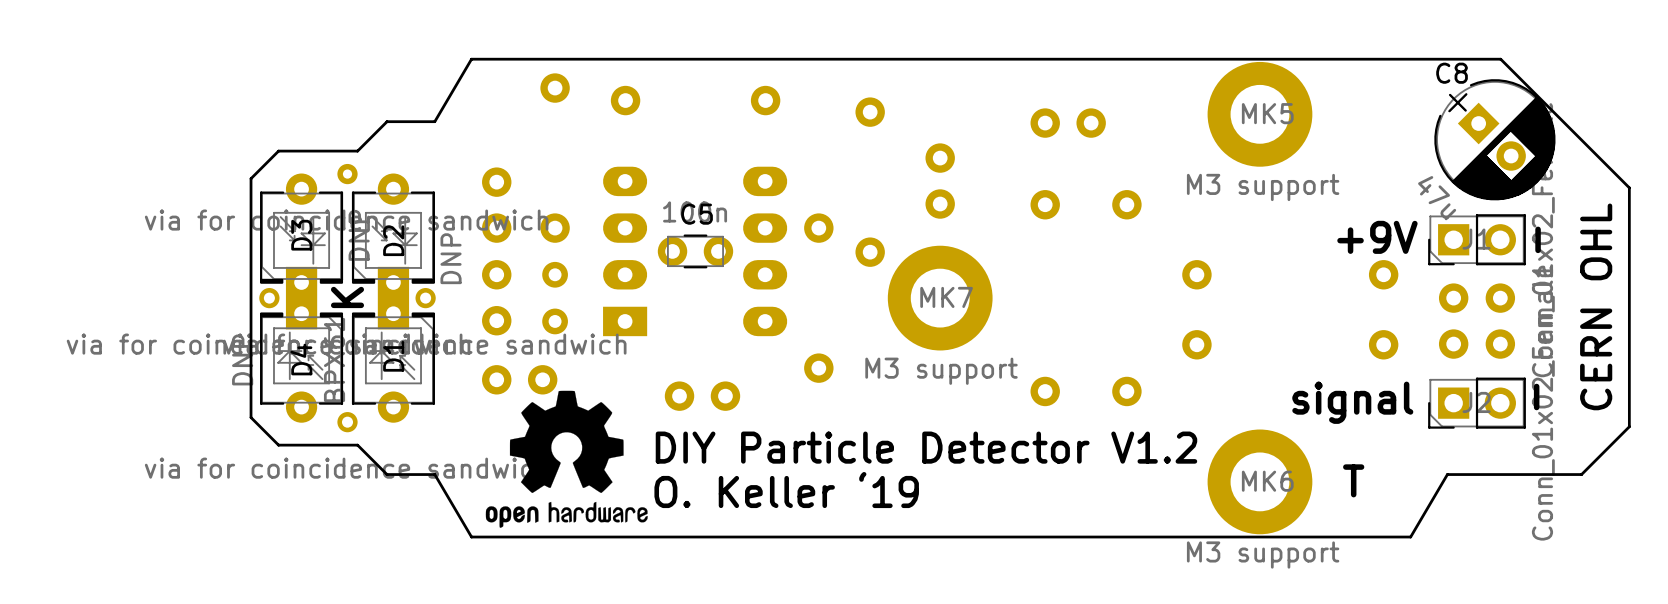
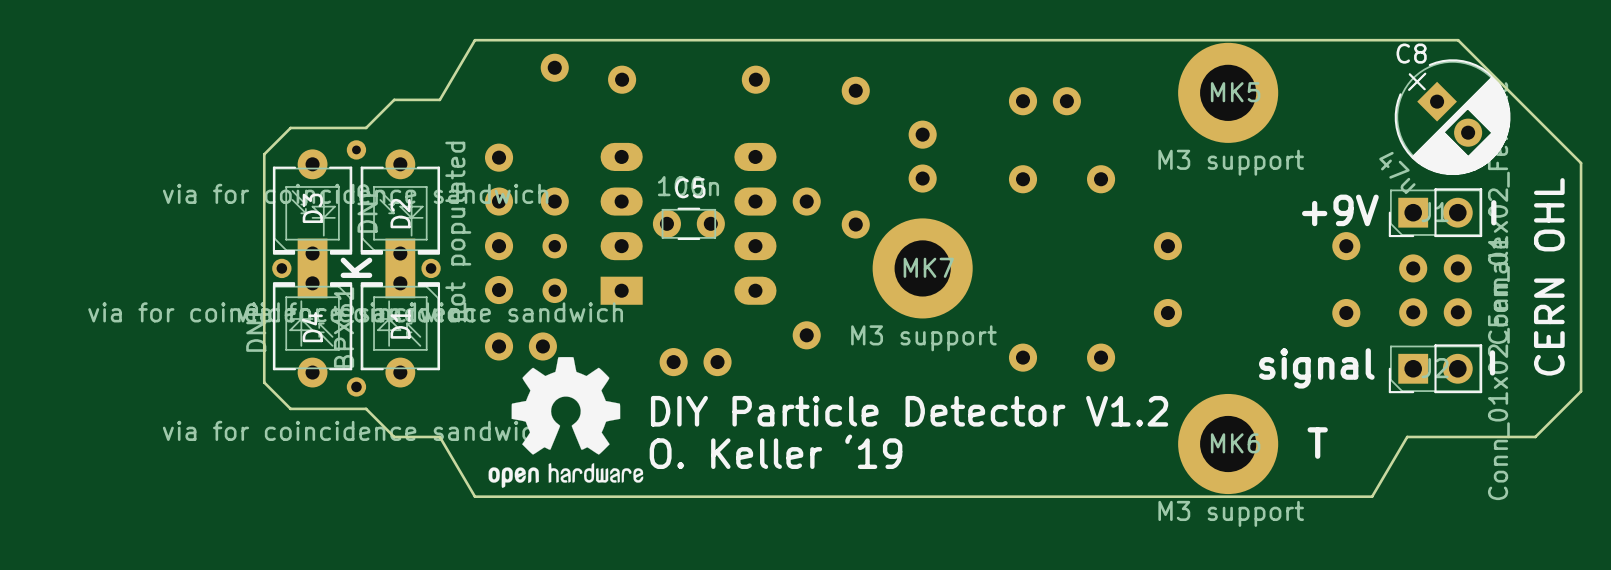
D2 value: DNP (451, 258) -> not populated (458, 231)

